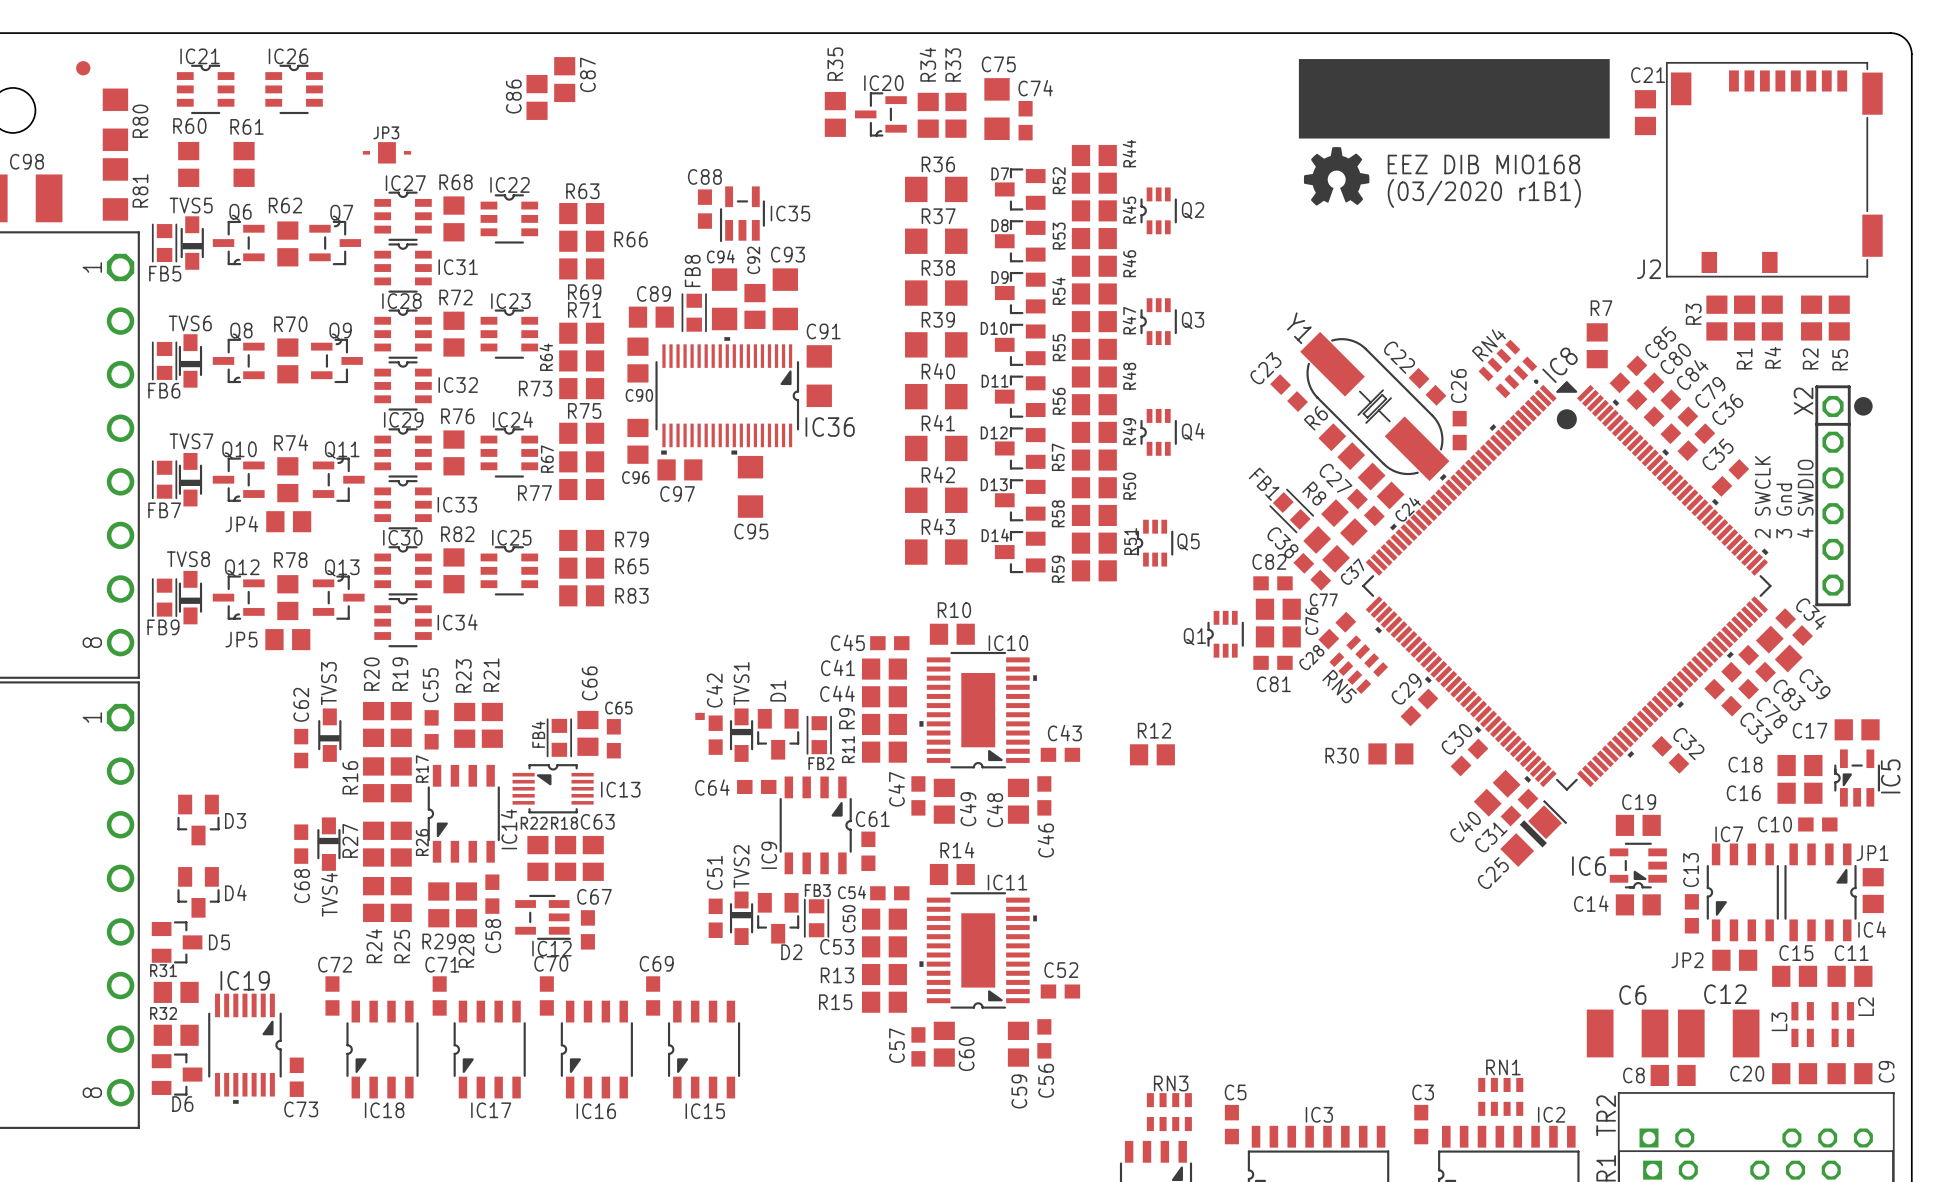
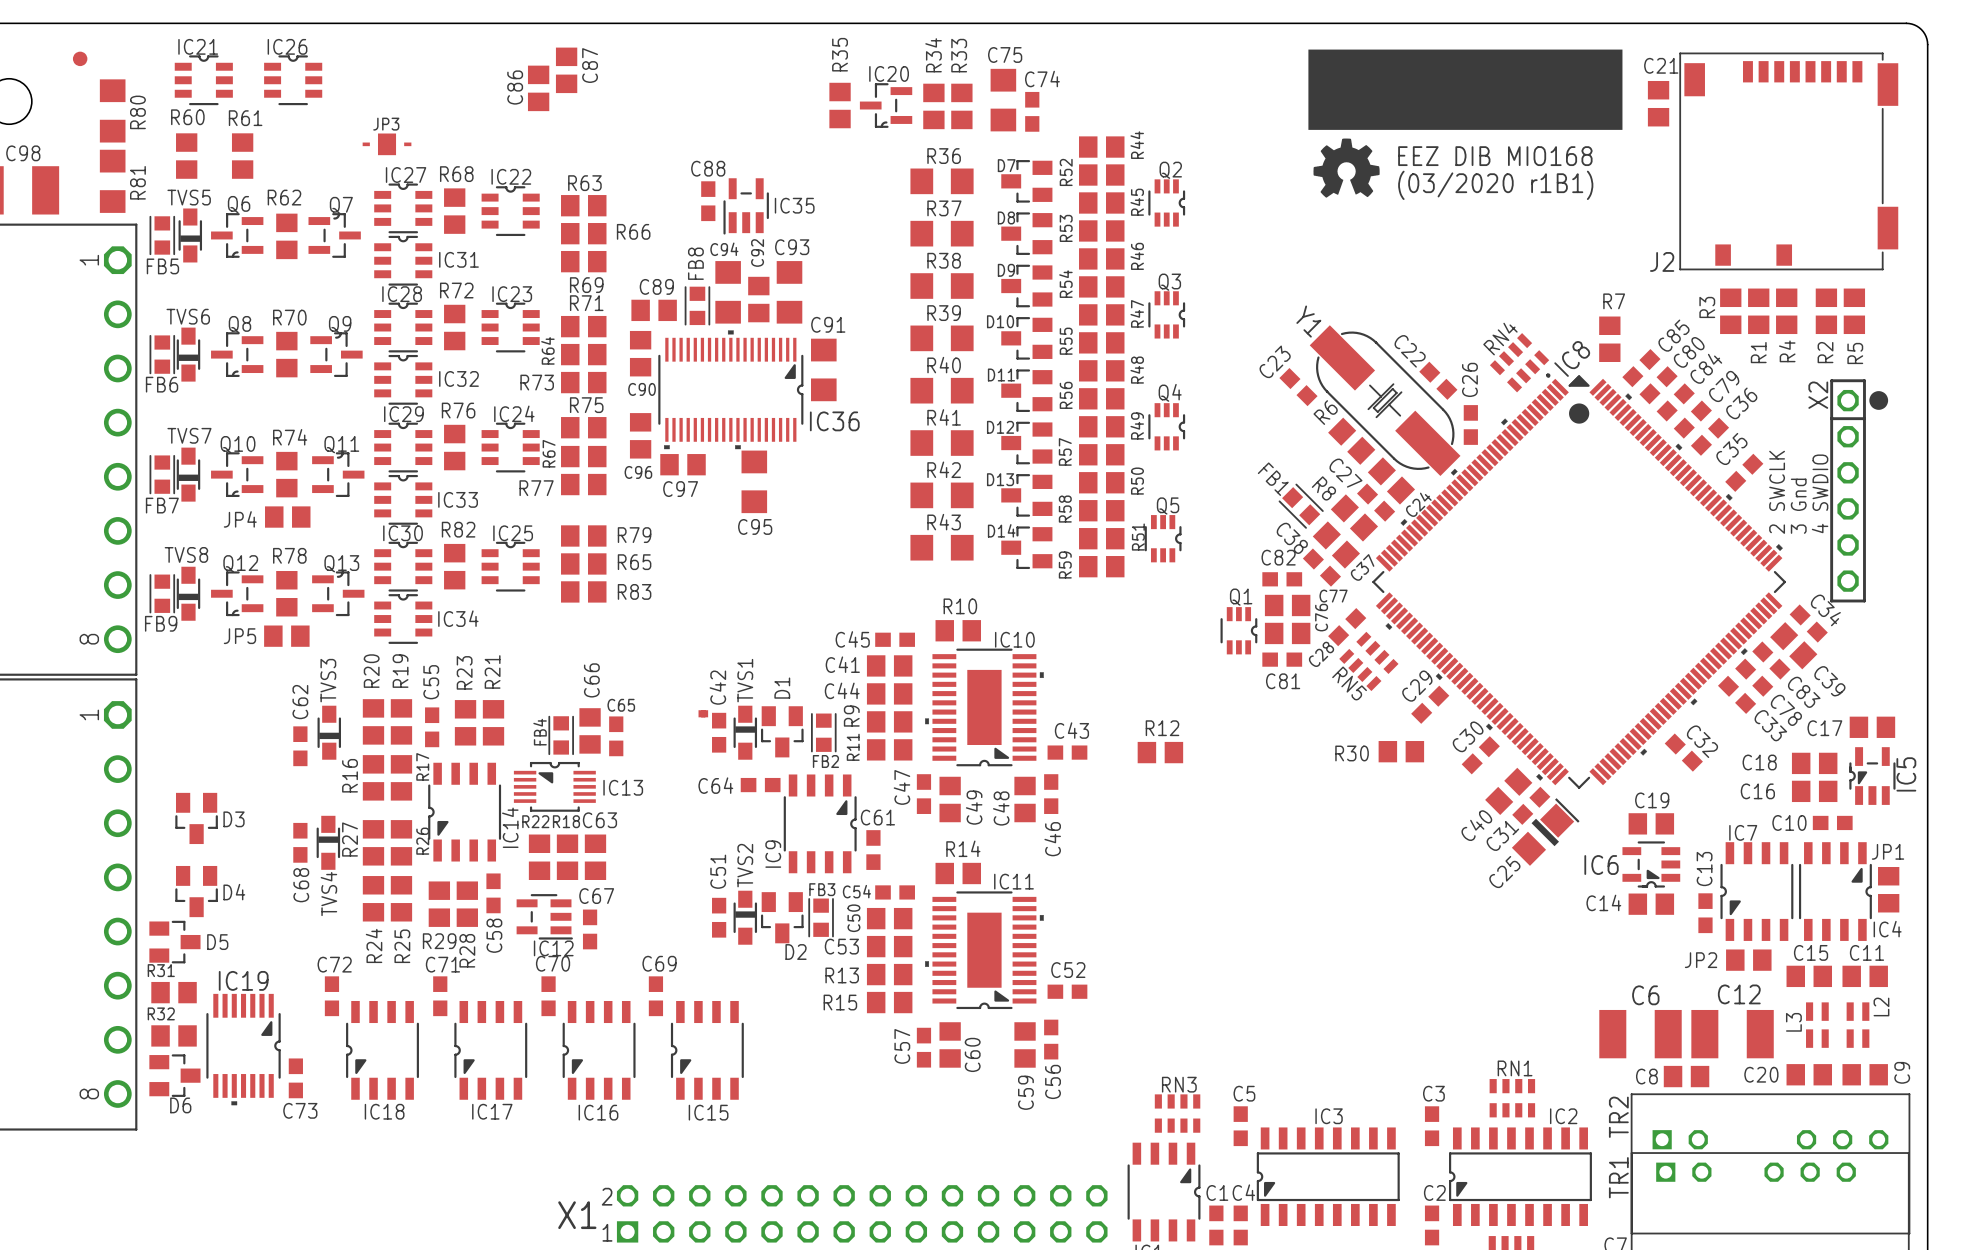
Q2 rotation: 0° (1158, 210) -> 180° (1166, 202)
Q2 name position: Q2 (1193, 210) -> Q2 (1170, 170)
Q3 name position: Q3 (1193, 320) -> Q3 (1169, 282)
Q3 rotation: 0° (1158, 321) -> 180° (1166, 314)
Q4 name position: Q4 (1193, 431) -> Q4 (1170, 392)
Q4 rotation: 0° (1158, 432) -> 180° (1166, 426)
Q5 name position: Q5 (1188, 542) -> Q5 (1168, 505)
Q5 rotation: 0° (1155, 543) -> 180° (1163, 538)
Q1 rotation: 0° (1225, 634) -> 180° (1238, 630)
Q1 name position: Q1 (1194, 636) -> Q1 (1241, 597)

